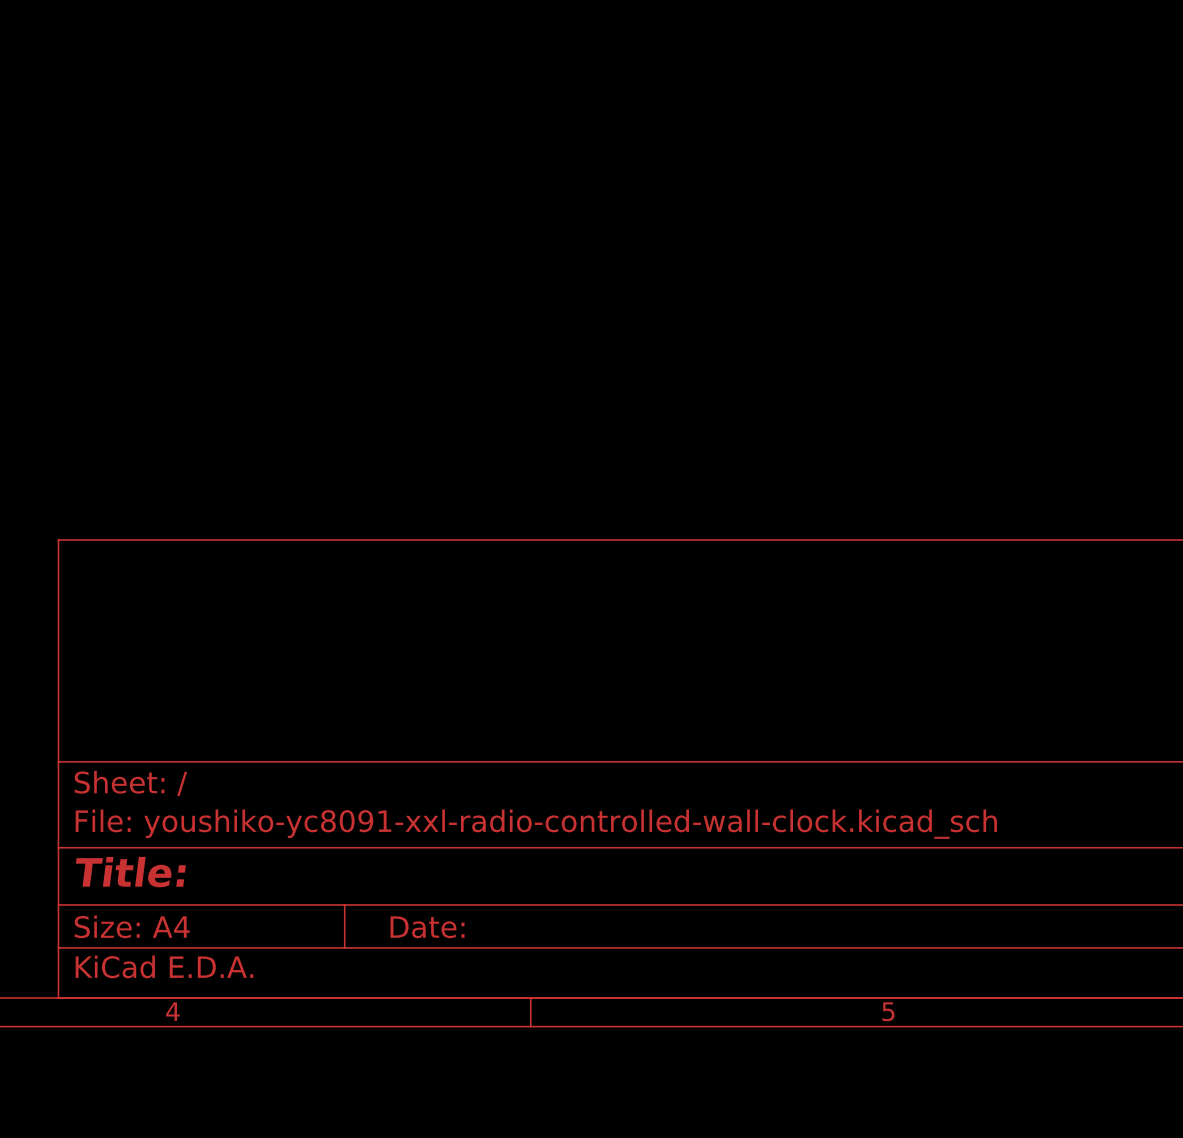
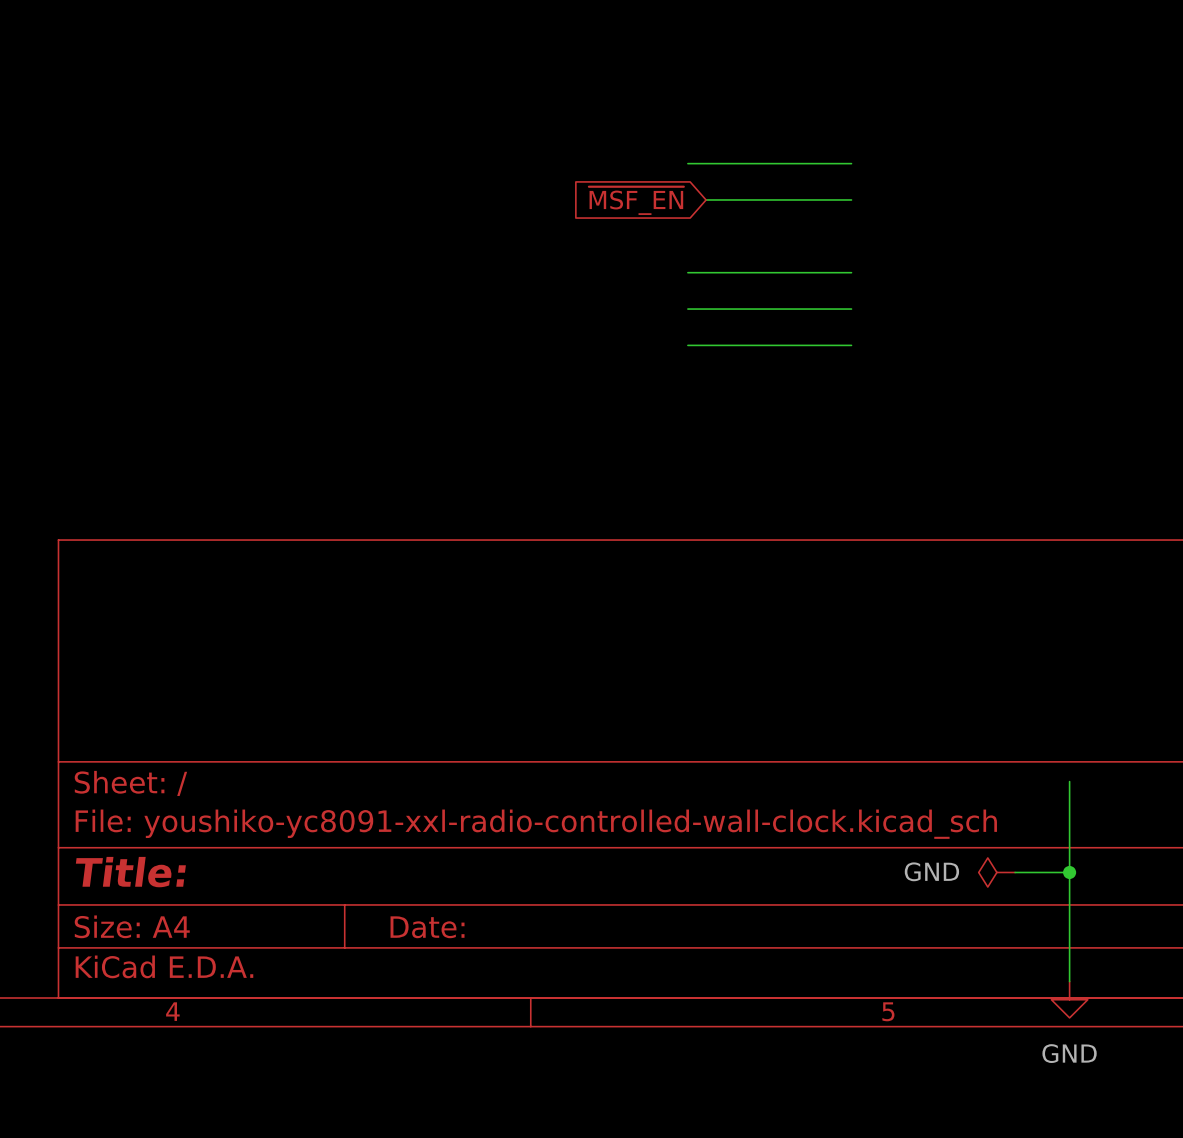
wire: none -> (687, 163) (851, 163)
wire: none -> (706, 199) (851, 199)
global label: none -> ~{MSF_EN} (636, 200)
wire: none -> (687, 272) (851, 272)
wire: none -> (687, 309) (851, 309)
wire: none -> (687, 345) (851, 345)
wire: none -> (1069, 781) (1069, 981)
power symbol: none -> GND (996, 872)
wire: none -> (1015, 872) (1069, 872)
junction: none -> (1069, 872)
power symbol: none -> GND (1069, 999)

